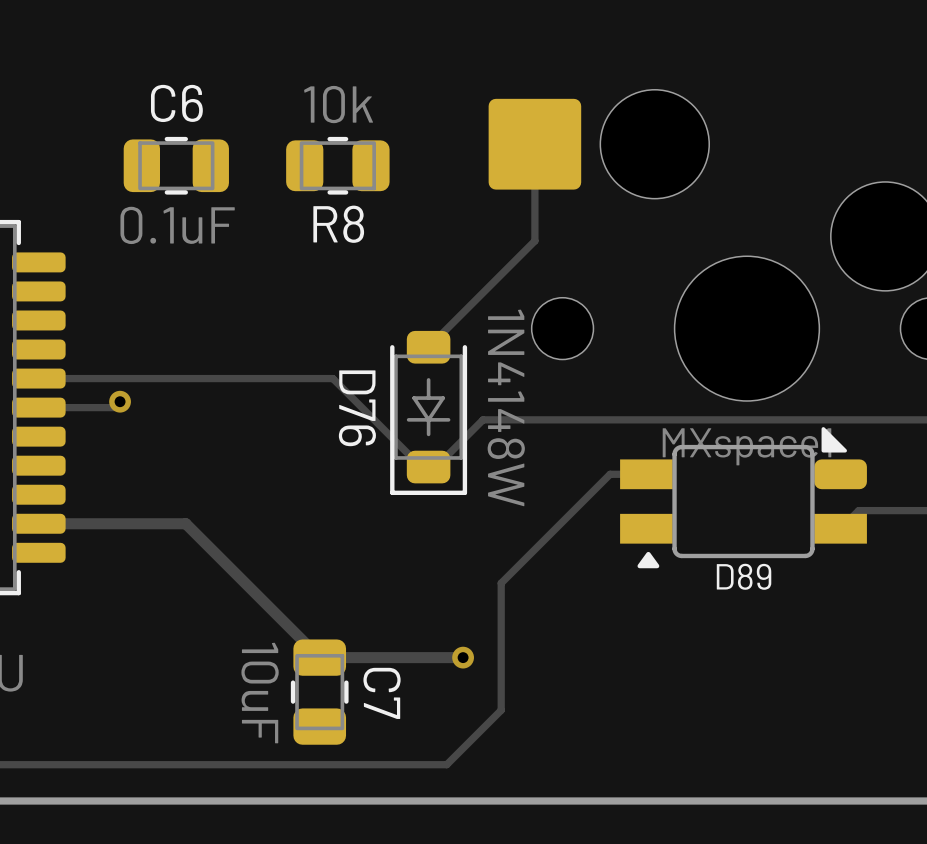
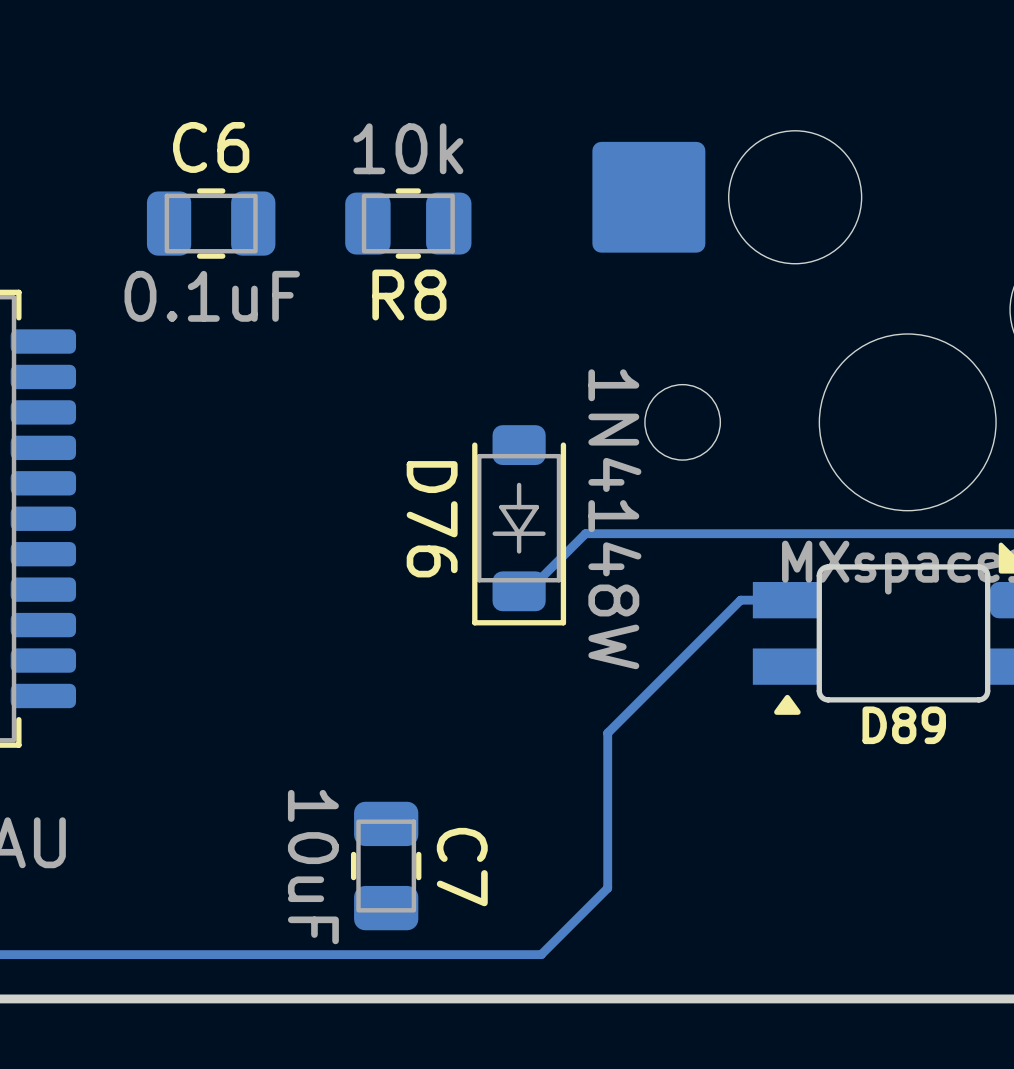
track: (534, 144) (534, 240) (428, 347) -> none
track: (38, 378) (332, 378) (421, 467) (428, 467) -> none
via: (120, 401) -> none
track: (114, 407) (38, 407) -> none
track: (38, 523) (185, 523) (319, 657) (463, 657) (464, 655) -> none
via: (463, 657) -> none

